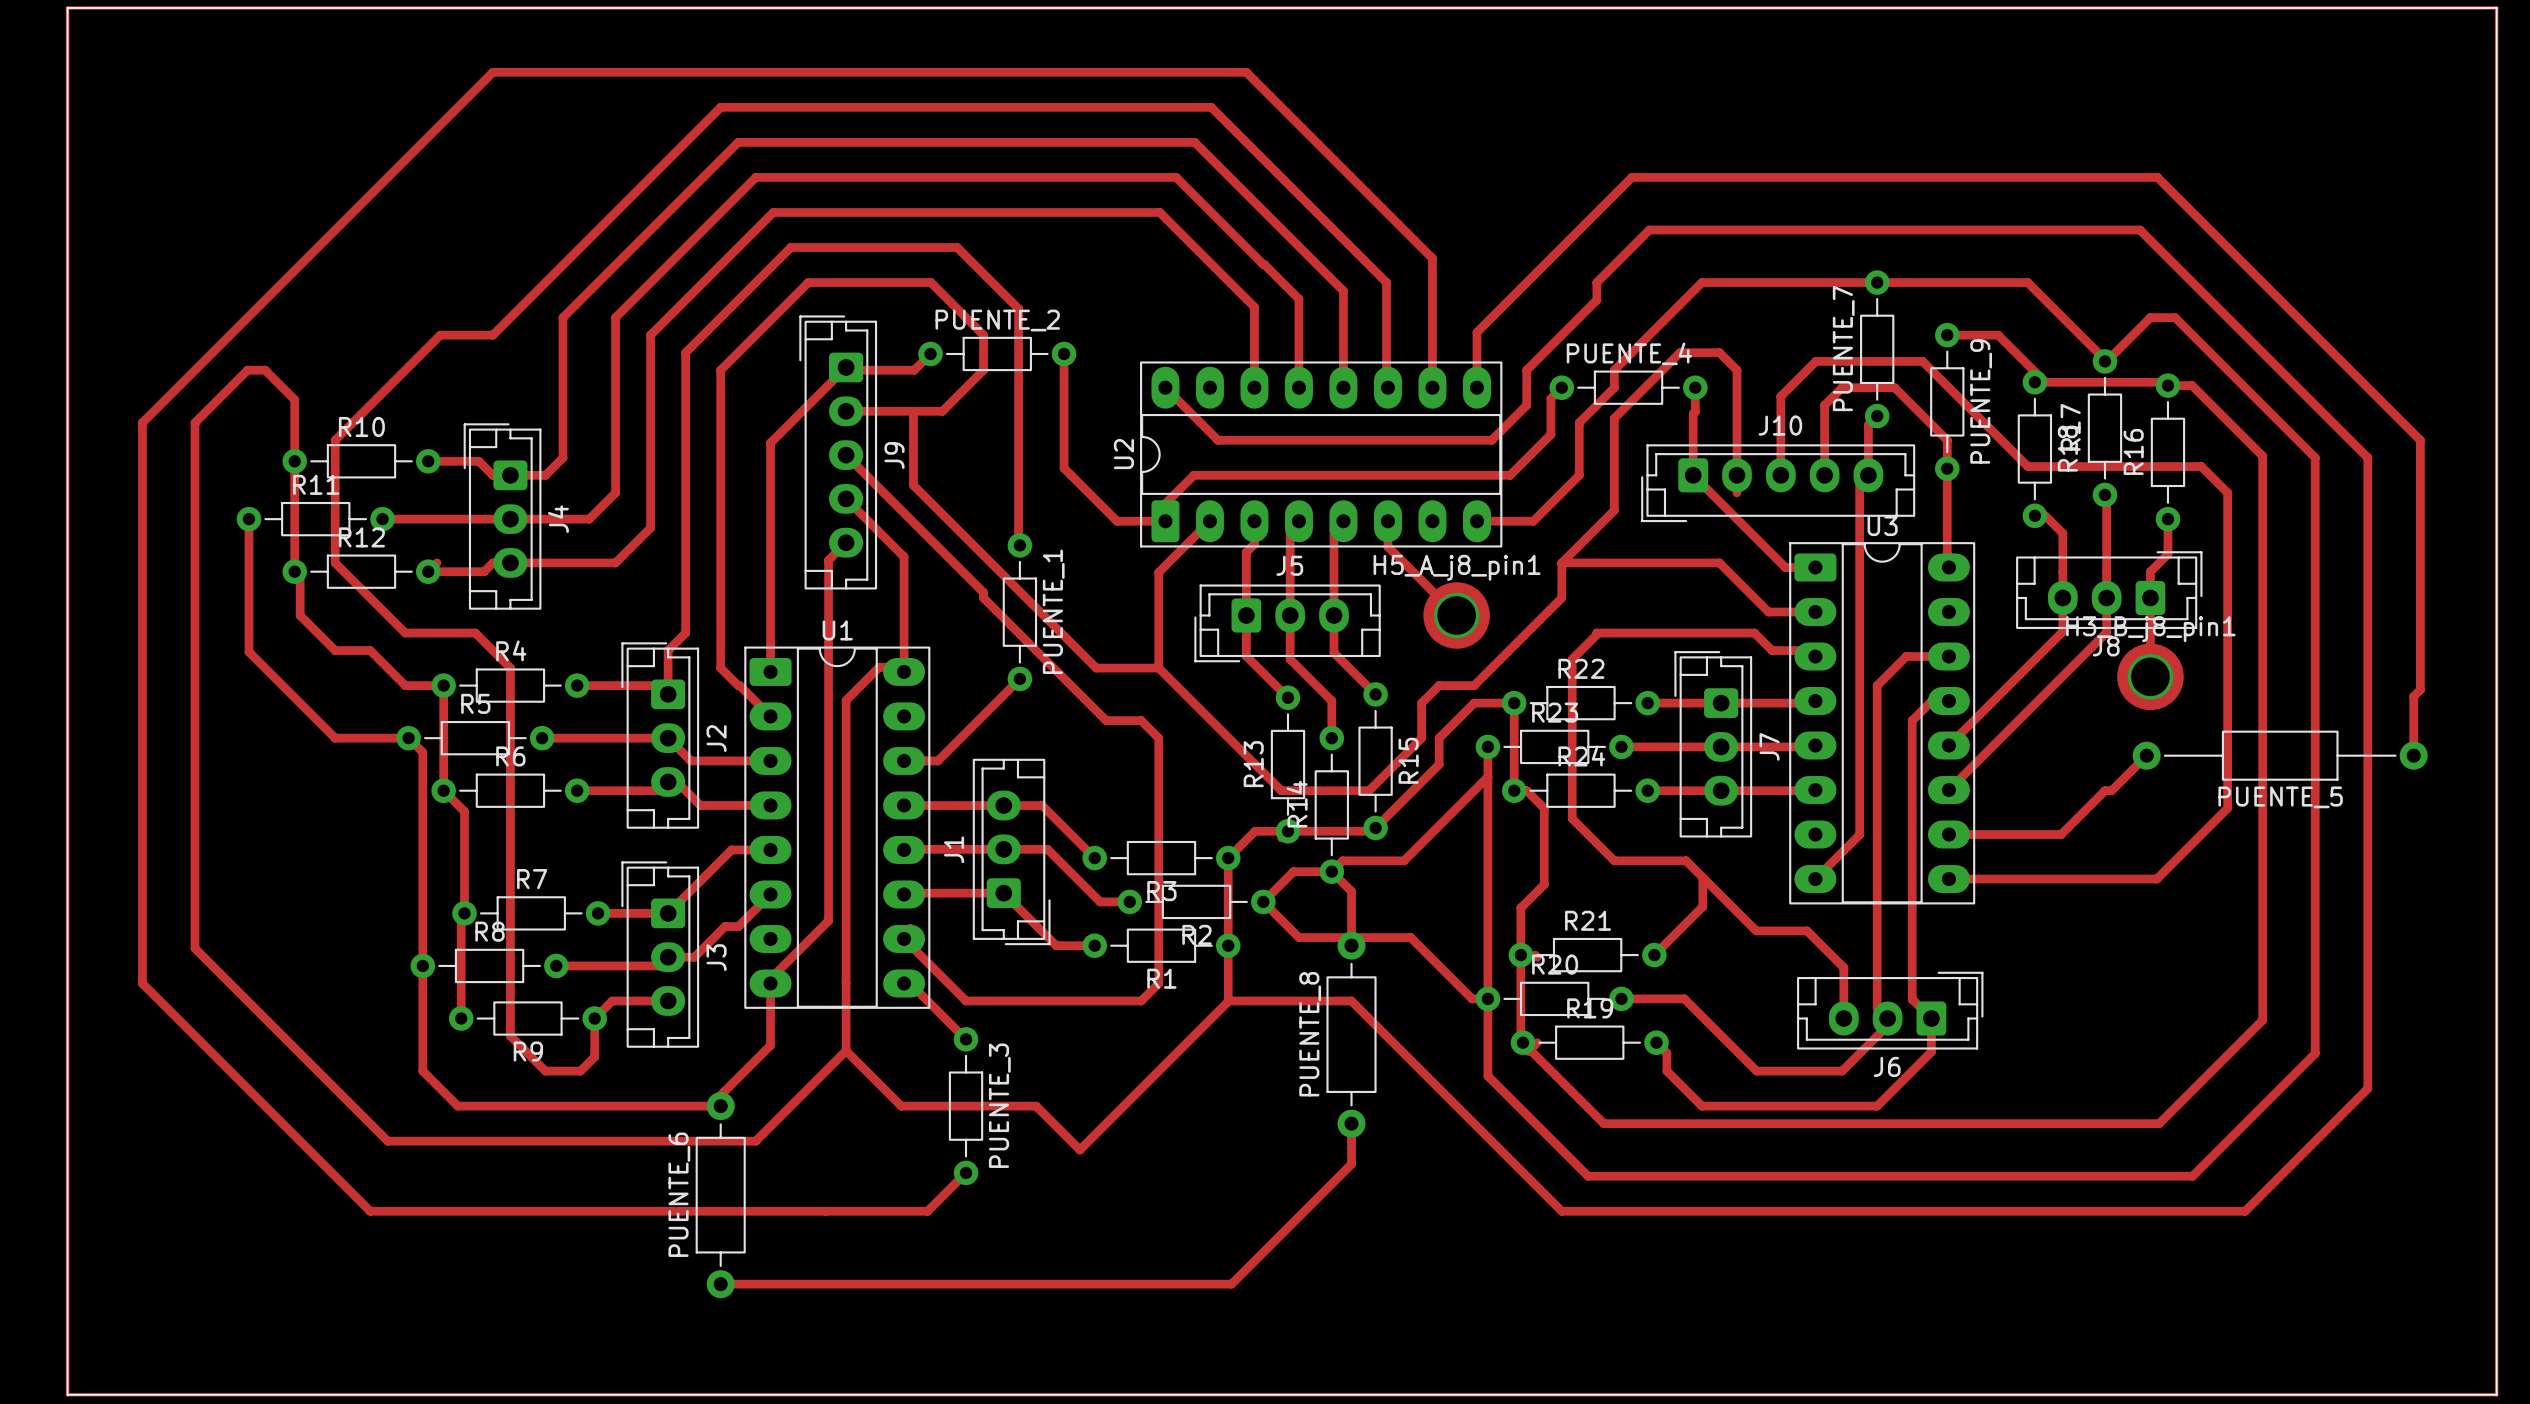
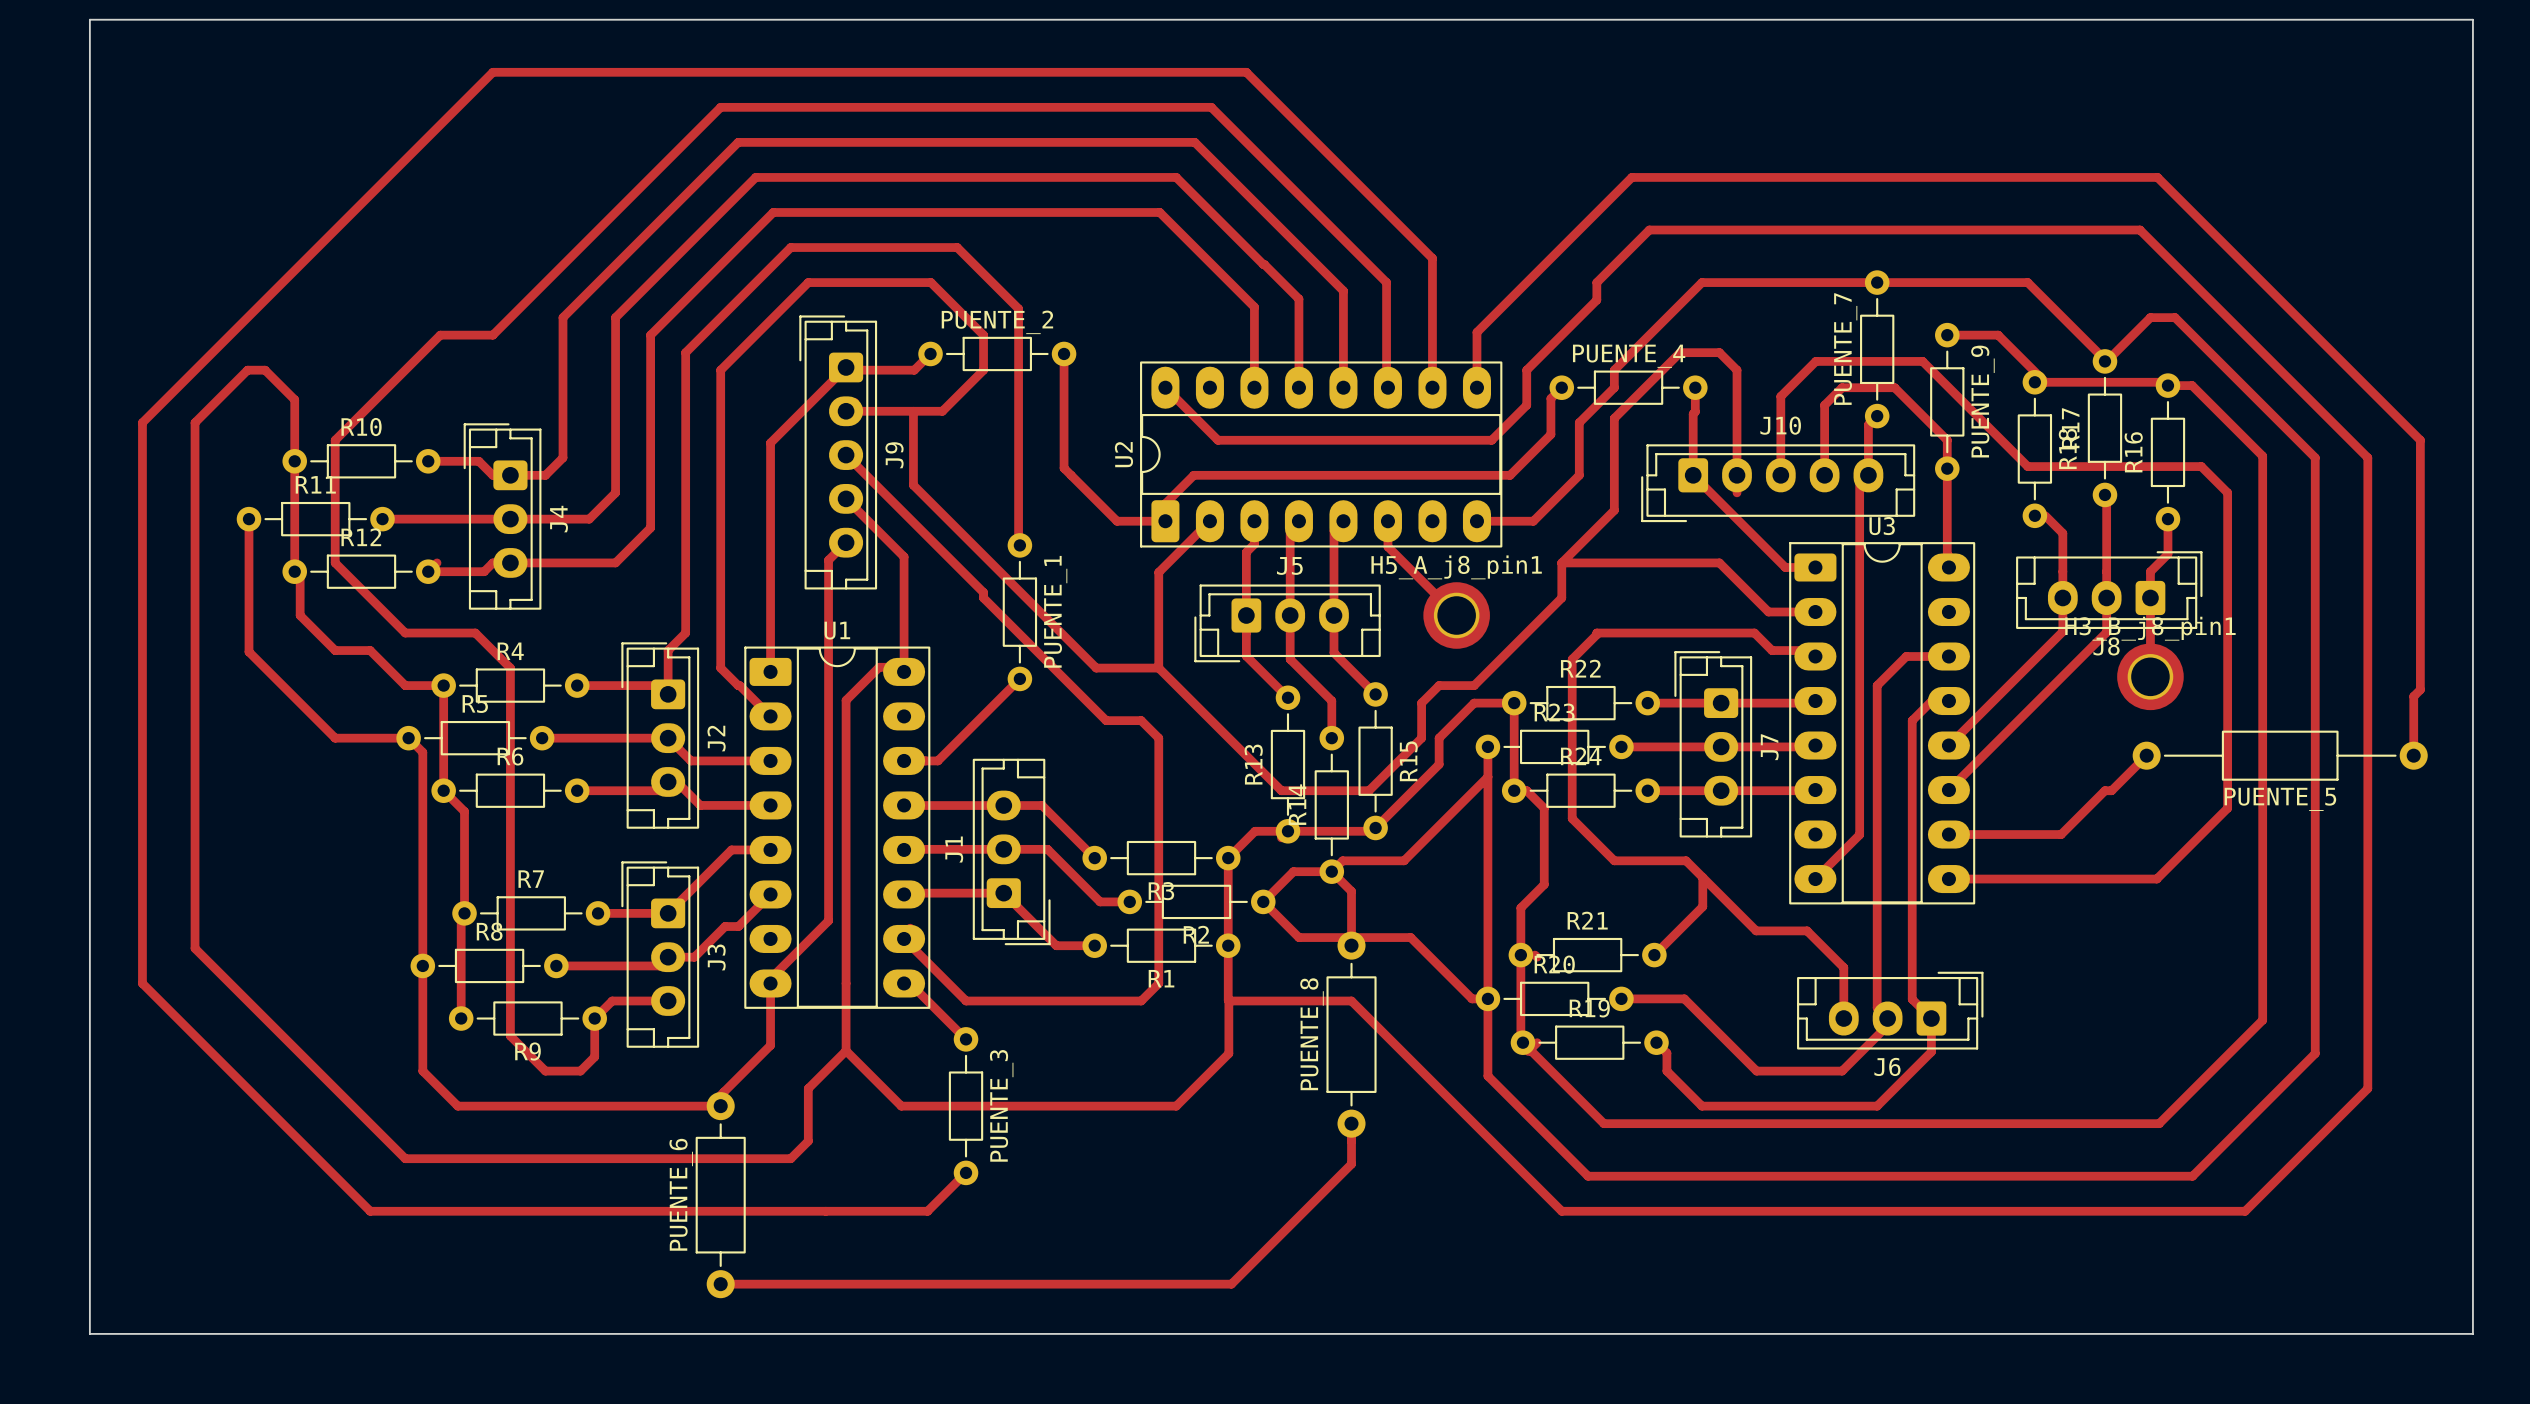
track: (67, 7) (2496, 7) (2496, 1394) (67, 1394) (67, 7) -> none
board edge: (67, 7) (2496, 7) (2496, 1394) (67, 1394) (67, 7) -> (89, 19) (89, 1333) (2472, 1333) (2472, 19) (89, 19)
track: (1228, 1001) (1079, 1149) (1036, 1106) -> (1228, 1001) (1228, 1053) (1176, 1106) (1036, 1106)
track: (808, 1088) (755, 1141) (387, 1141) -> (808, 1088) (808, 1141) (790, 1158) (405, 1158) (387, 1141)

